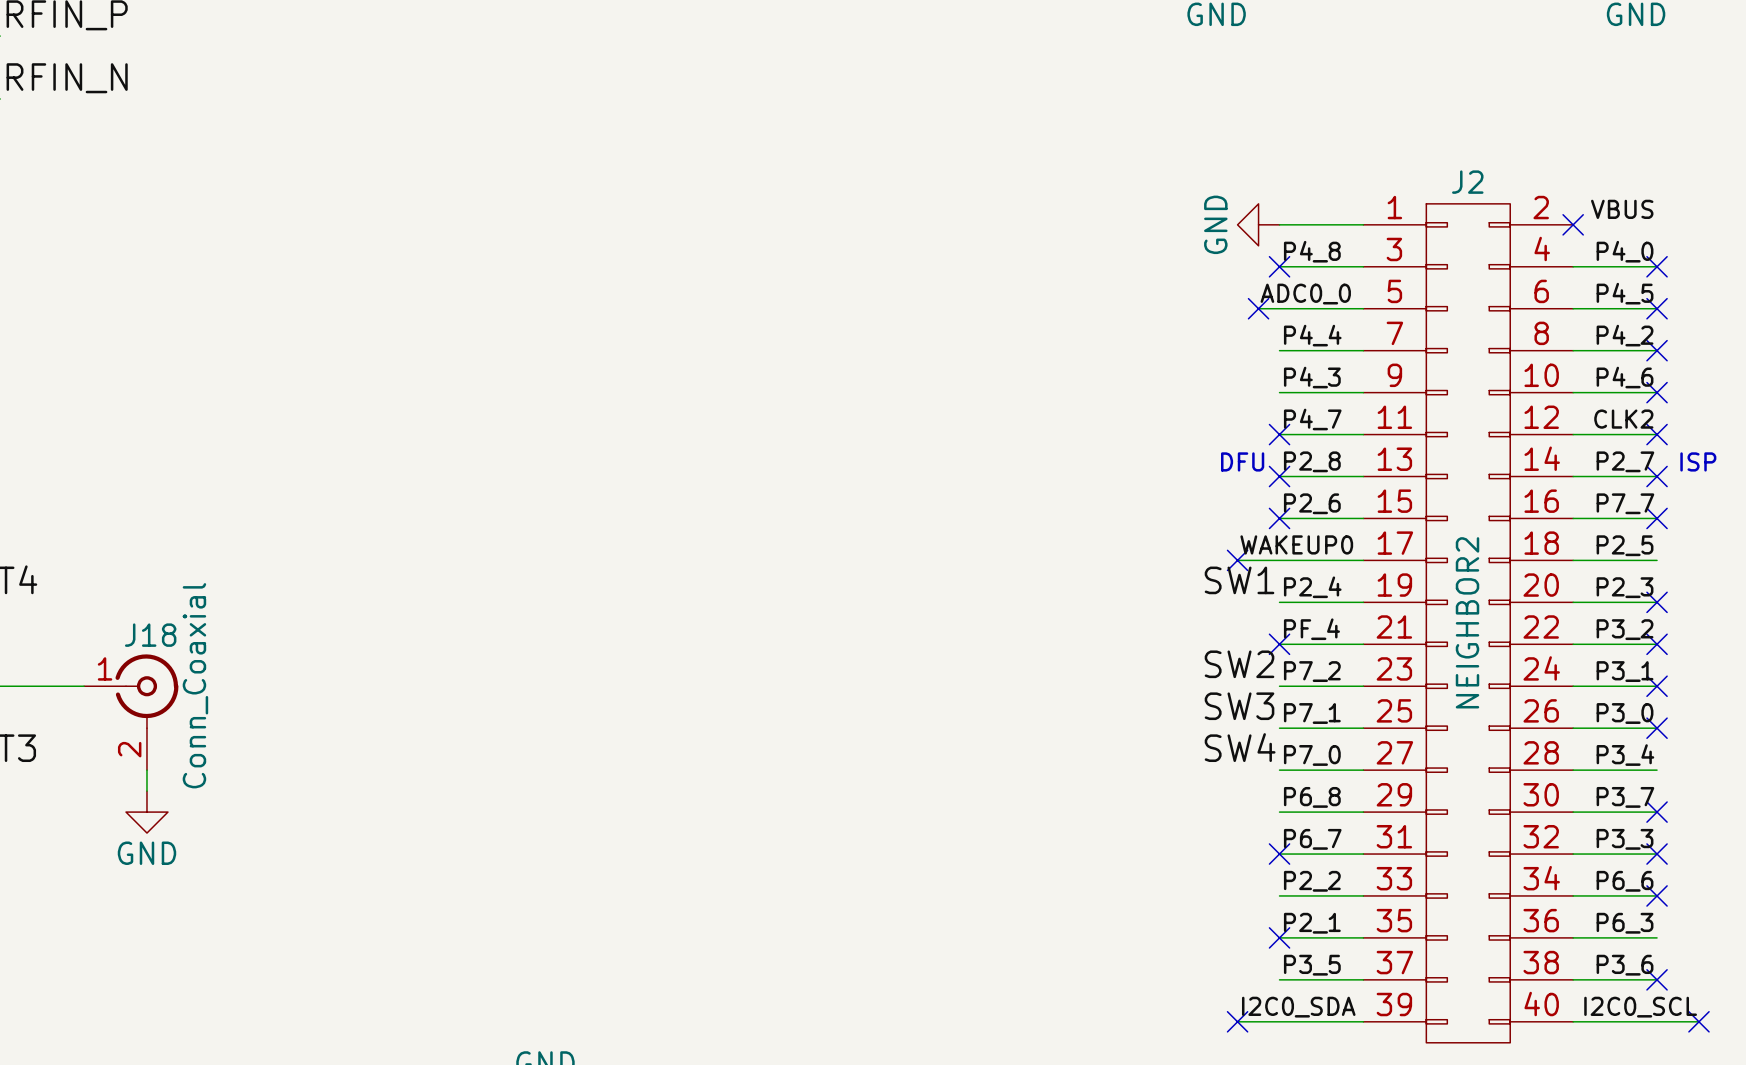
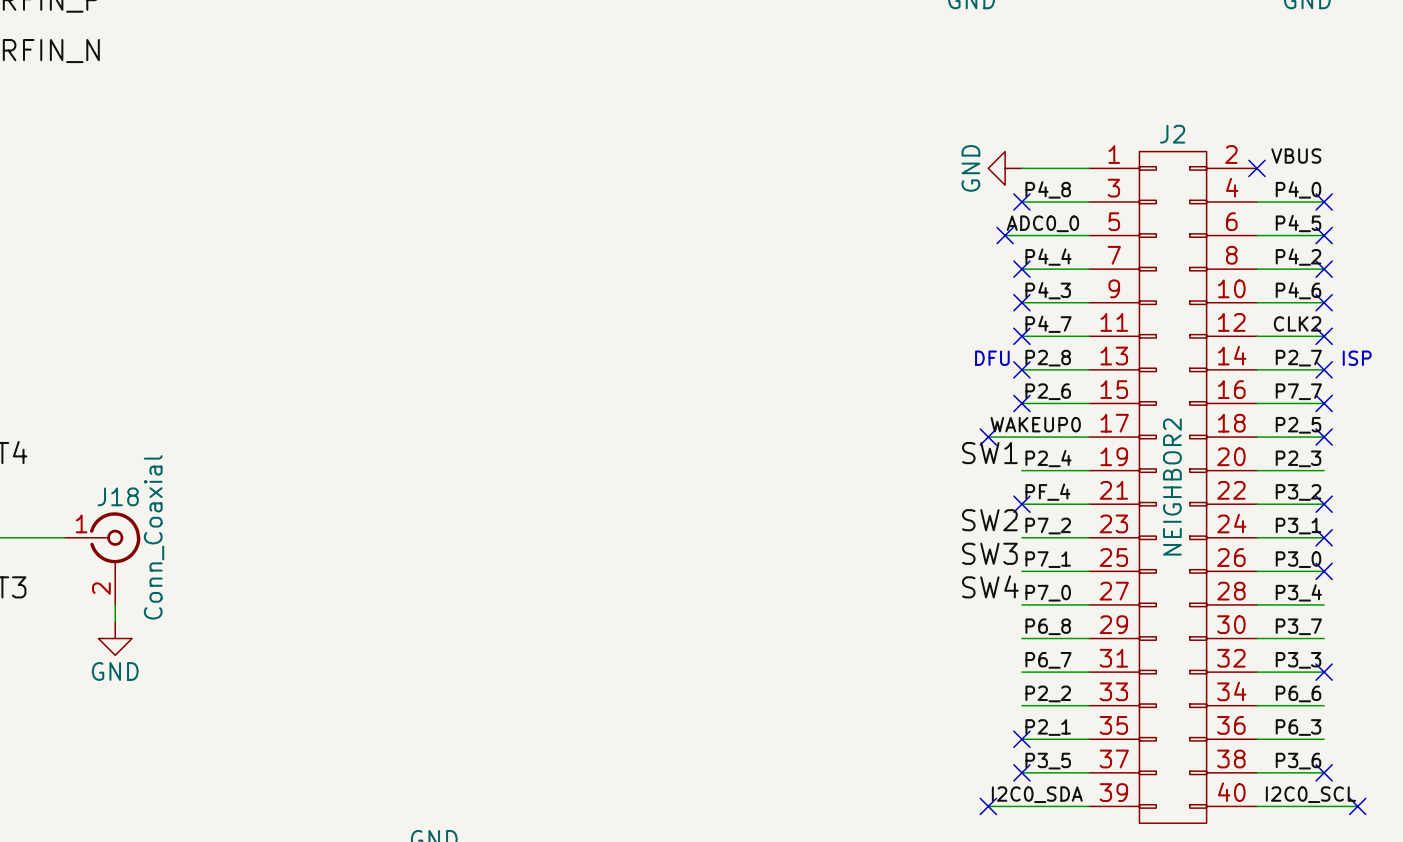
no-connect mark: none -> (1021, 269)
no-connect mark: none -> (1021, 302)
no-connect mark position: (1657, 602) -> (1324, 437)
no-connect mark: (1657, 812) -> none
no-connect mark: (1279, 854) -> none
no-connect mark: (1657, 895) -> none
no-connect mark: none -> (1021, 772)

